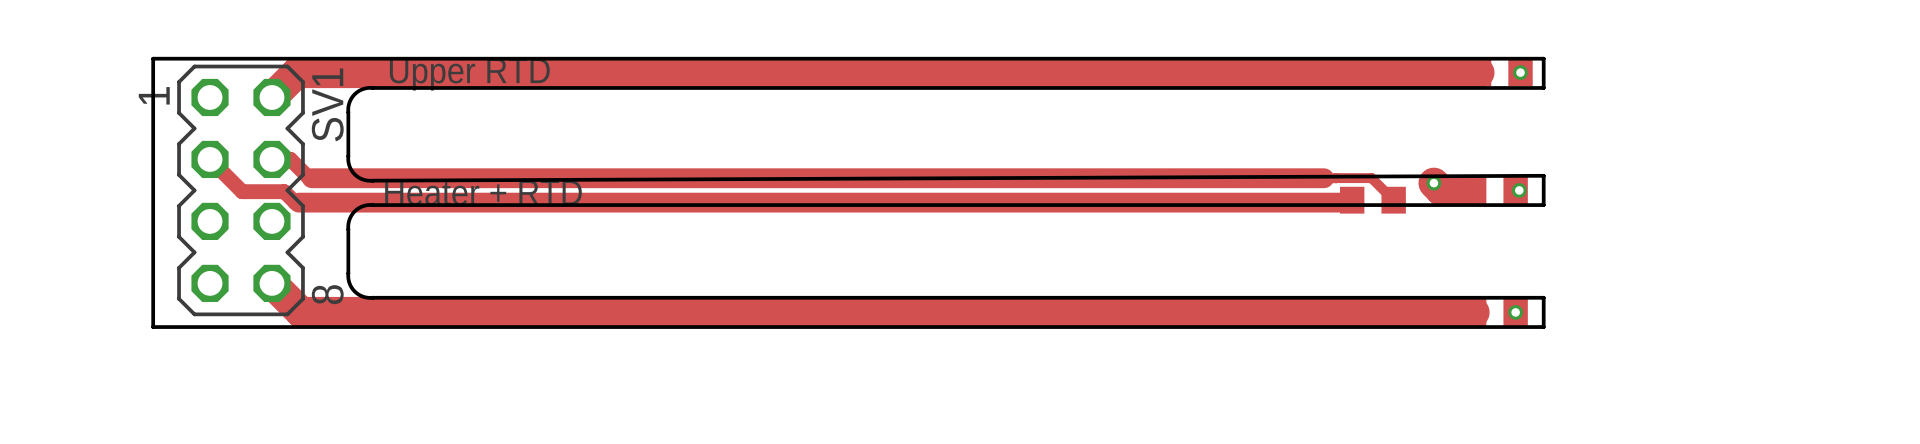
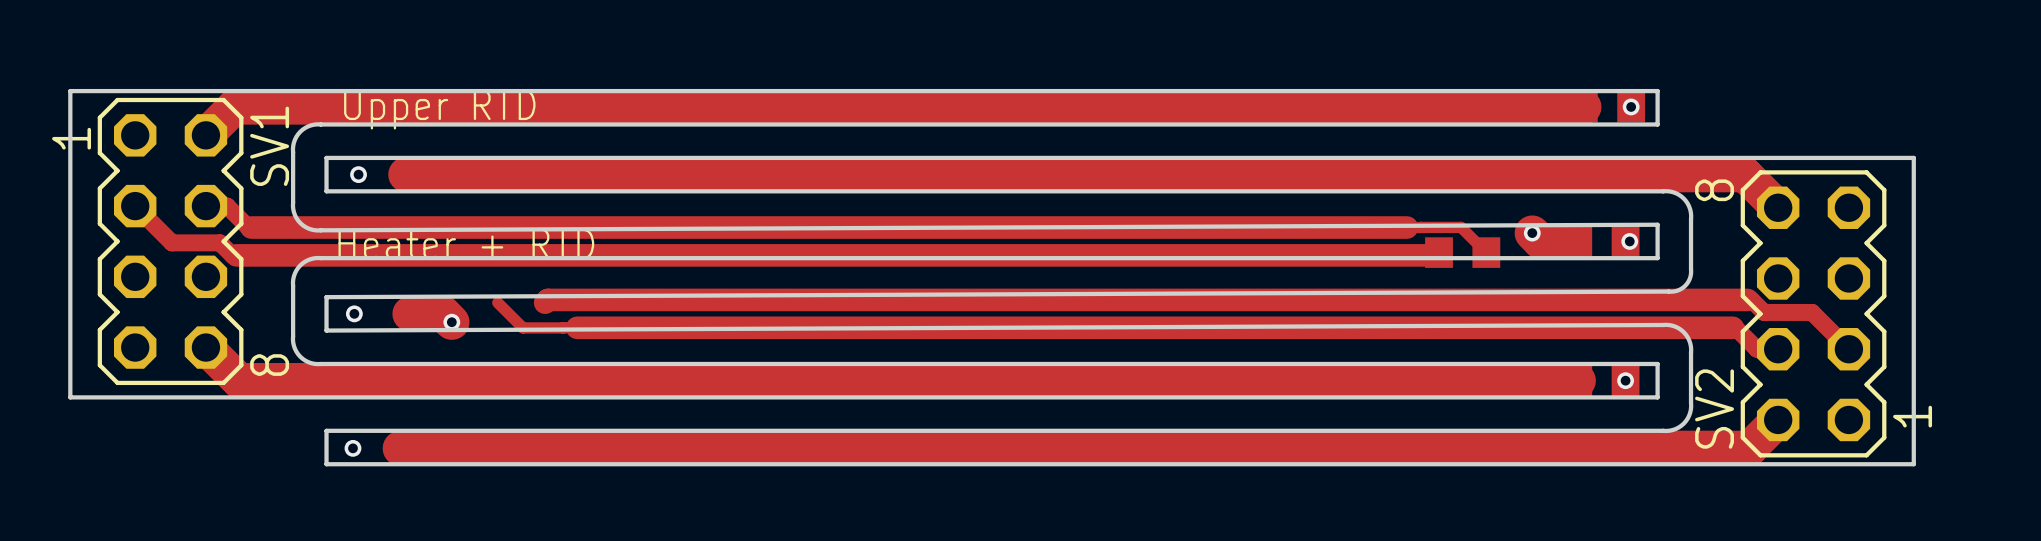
board edge: none -> (326, 157) (326, 191) (1666, 191) (1675, 193) (1683, 198) (1689, 206) (1691, 215) (1690, 276) (1683, 287) (1671, 291) (326, 297) (326, 330) (1669, 325) (1683, 332) (1689, 340) (1691, 349) (1690, 412) (1683, 423) (1669, 430) (326, 430) (326, 464) (1913, 464) (1913, 157) (326, 157)
via: none -> (358, 174)
track: none -> (405, 174) (1745, 174) (1778, 207)
track: none -> (497, 302) (523, 327) (563, 327)
track: none -> (545, 302) (547, 299) (1751, 299) (1764, 312) (1812, 312) (1848, 349)
via: none -> (354, 313)
track: none -> (410, 313) (443, 313) (451, 322)
SV2: none -> (1813, 313)
via: none -> (451, 322)
track: none -> (563, 327) (1735, 327) (1757, 349) (1778, 349)
track: none -> (1778, 419) (1749, 448) (400, 448)
via: none -> (352, 448)

